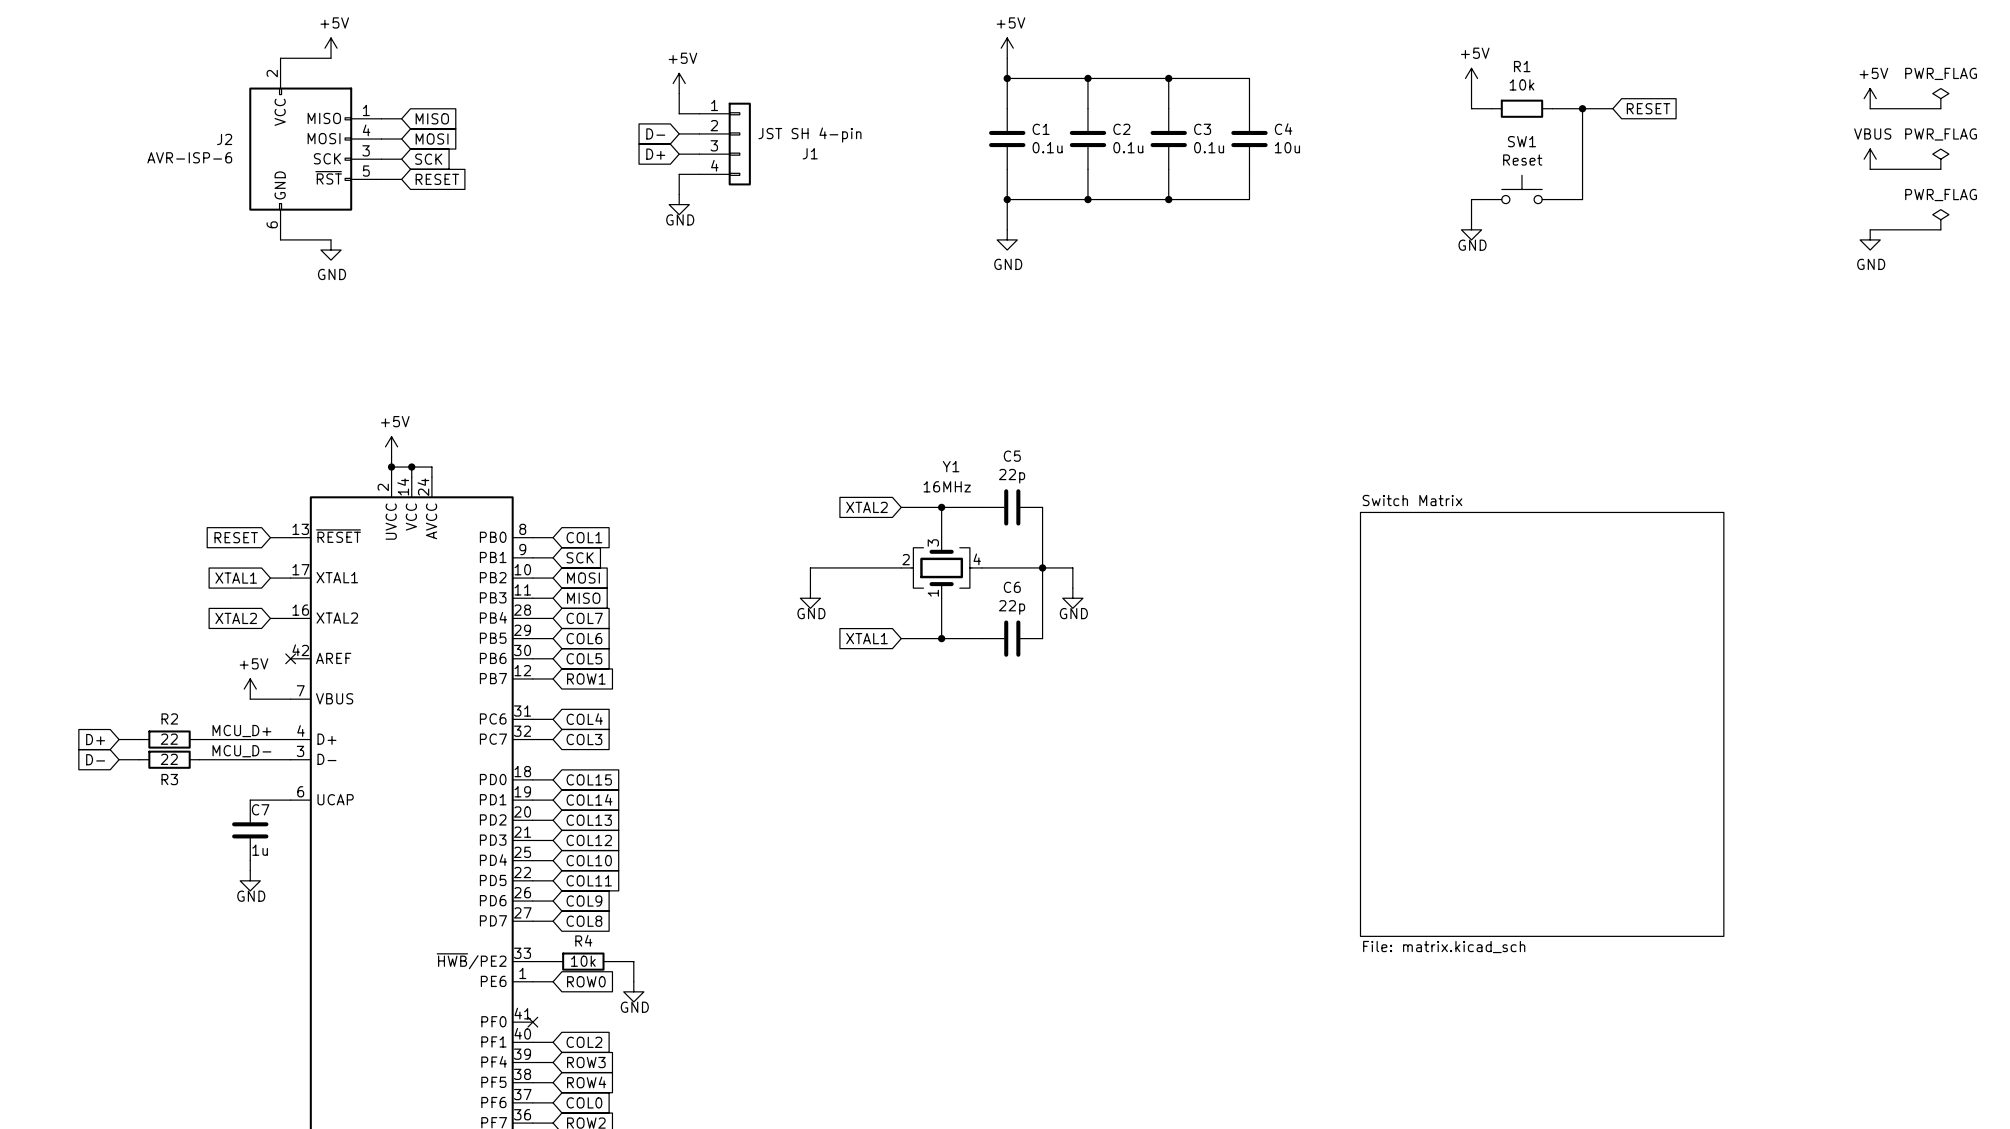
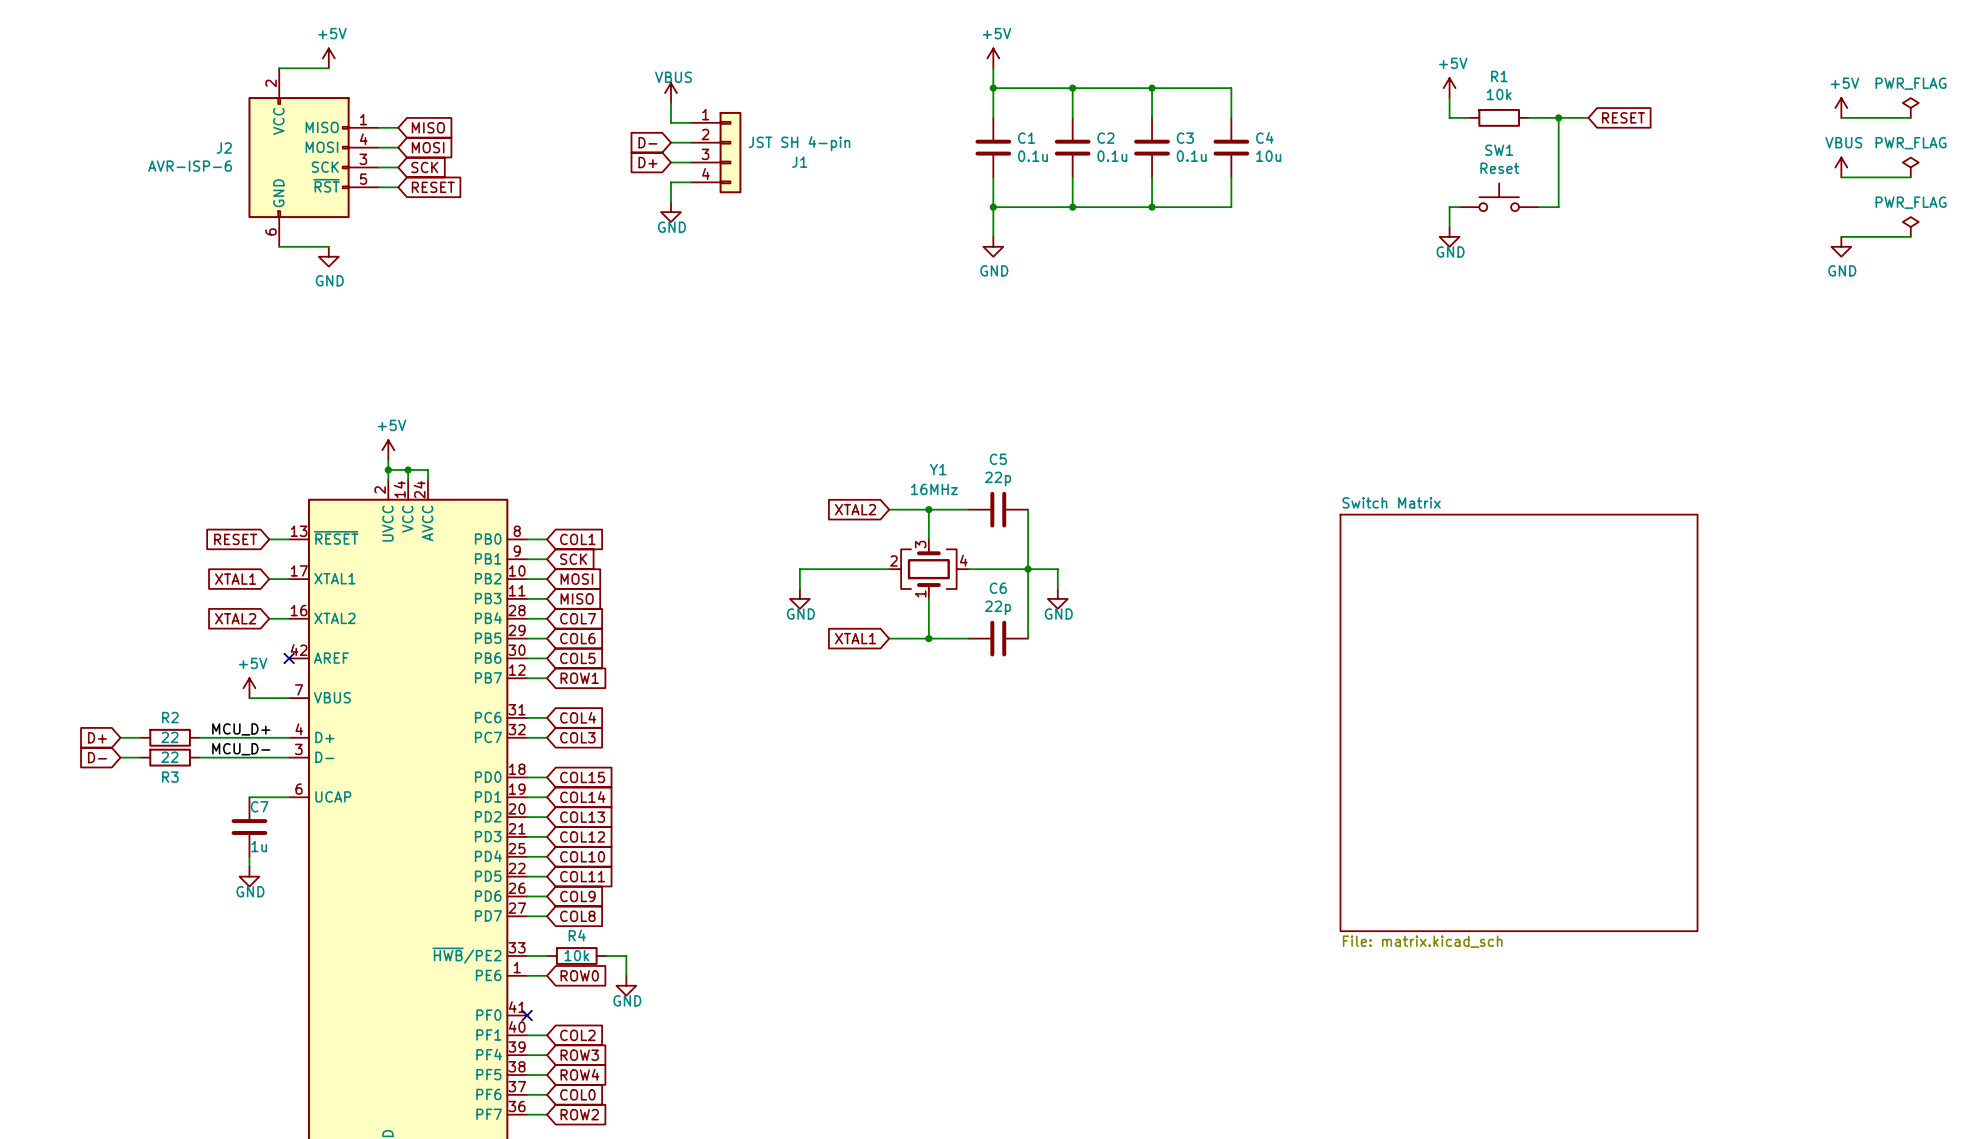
power symbol: +5V (679, 83) -> VBUS (670, 93)

